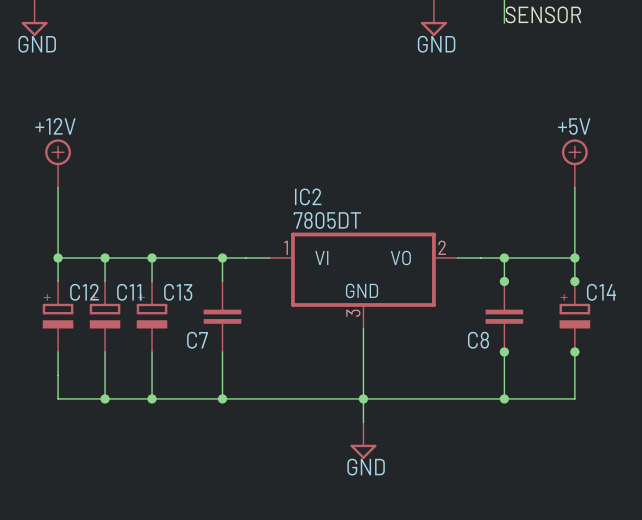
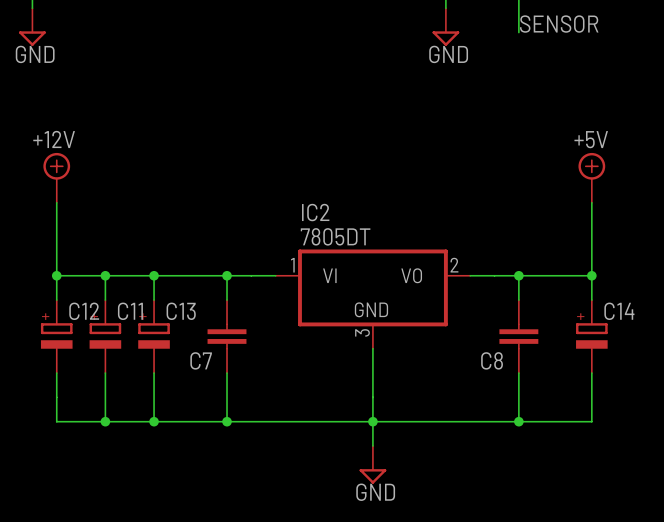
junction: (504, 281) -> none
junction: (574, 281) -> none
junction: (504, 351) -> none
junction: (574, 351) -> none

